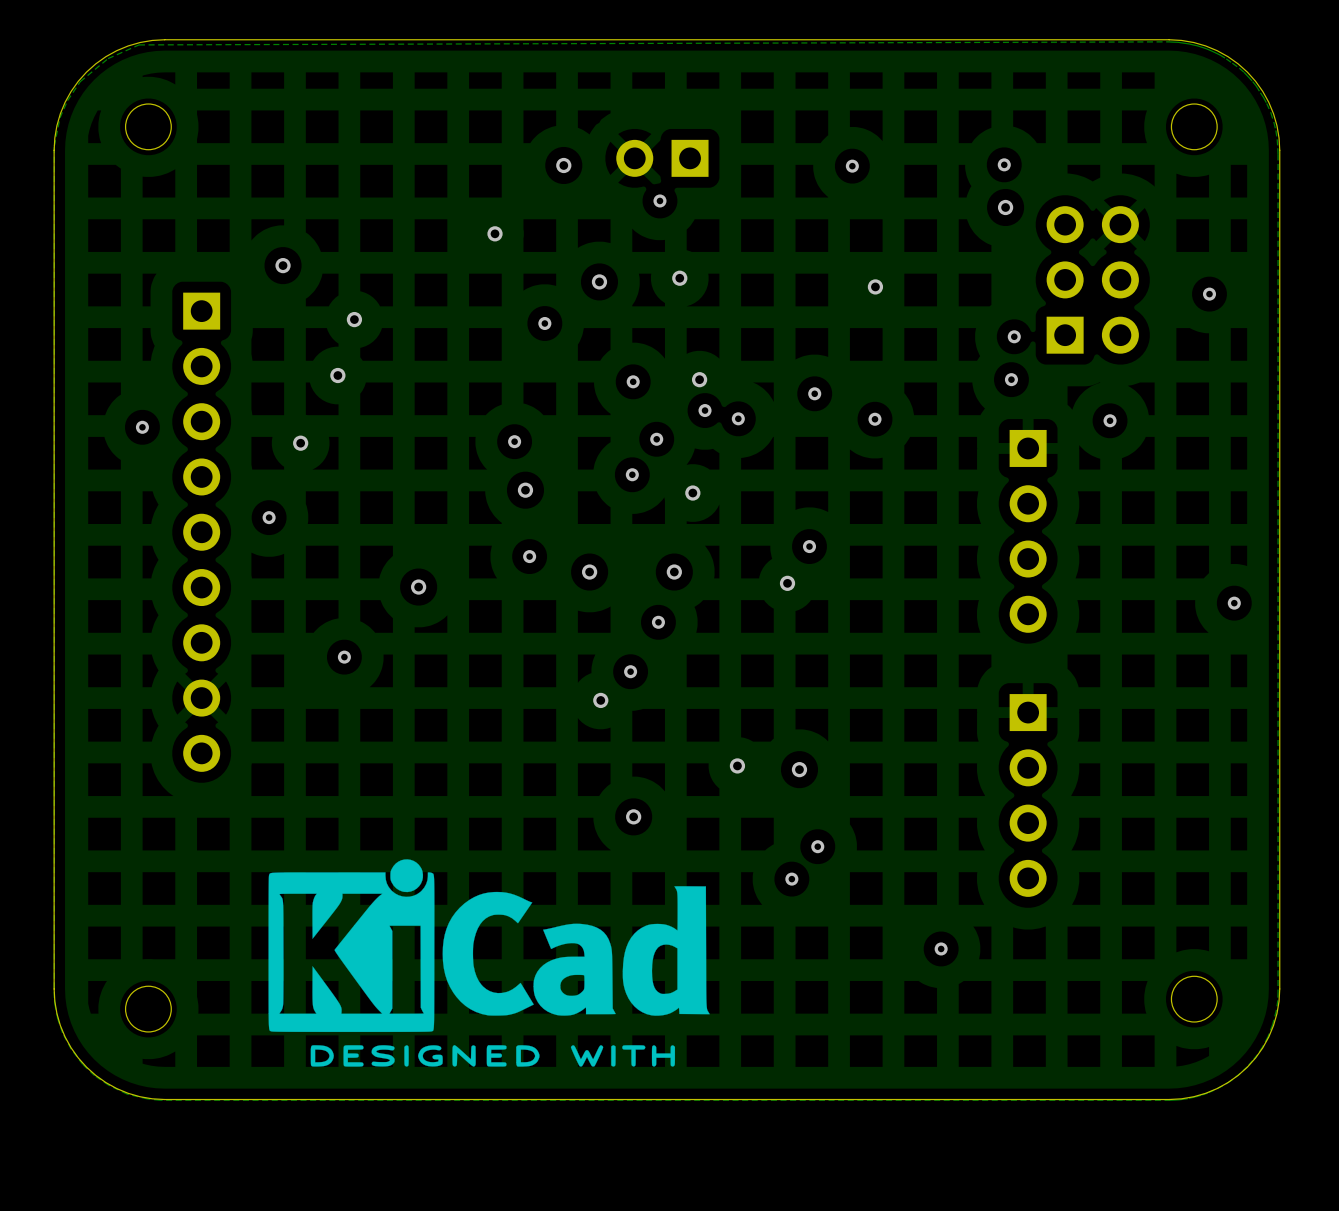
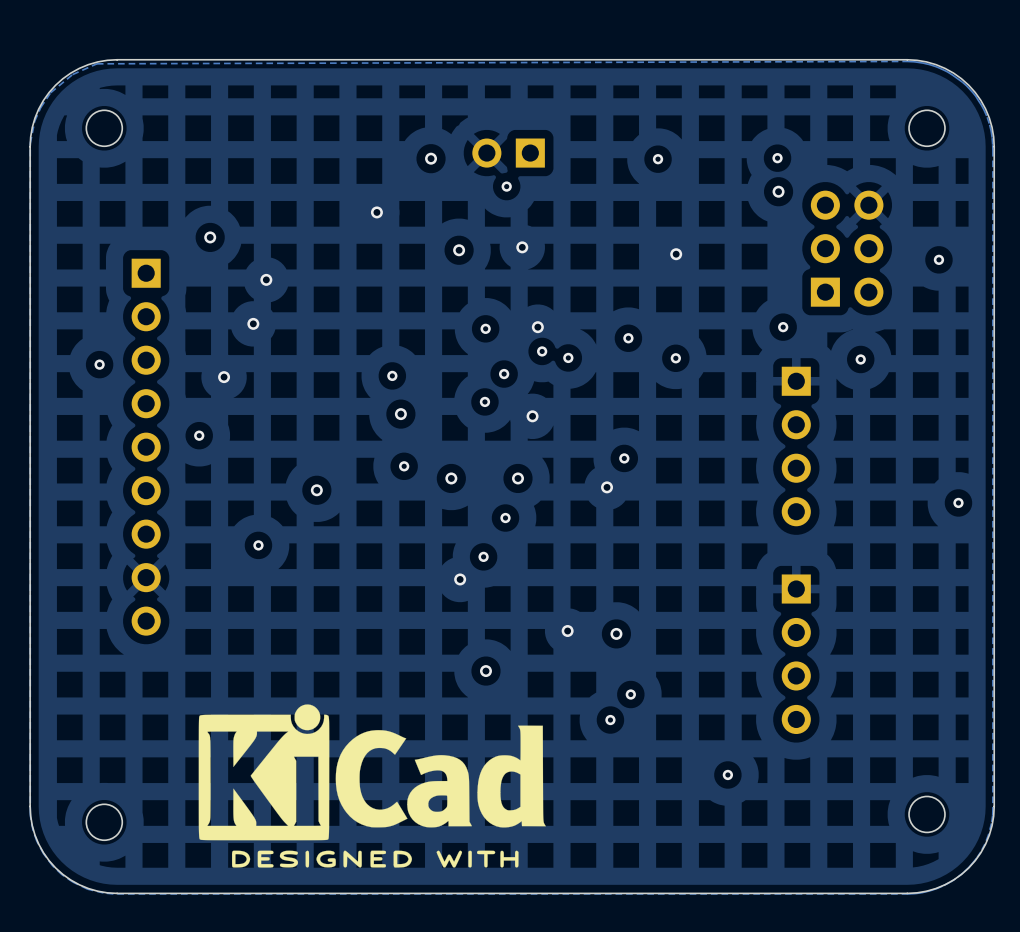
via: (544, 323) -> none
via: (1014, 336) -> none

